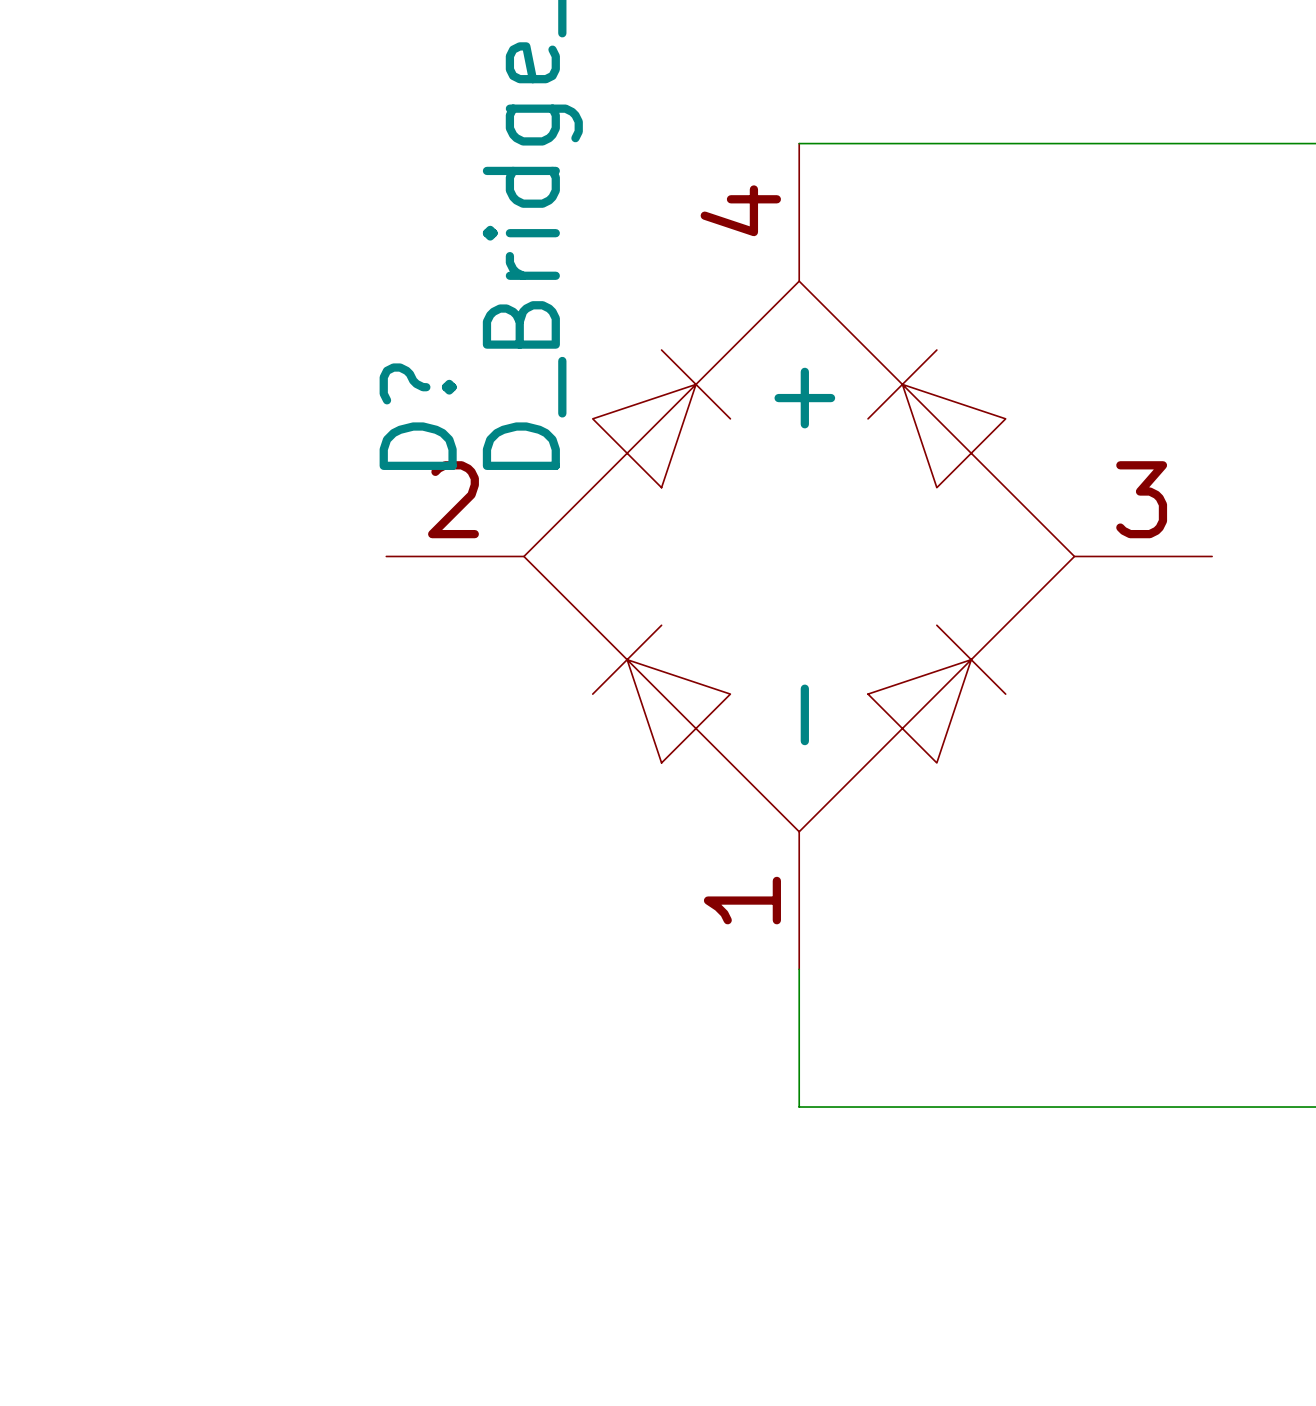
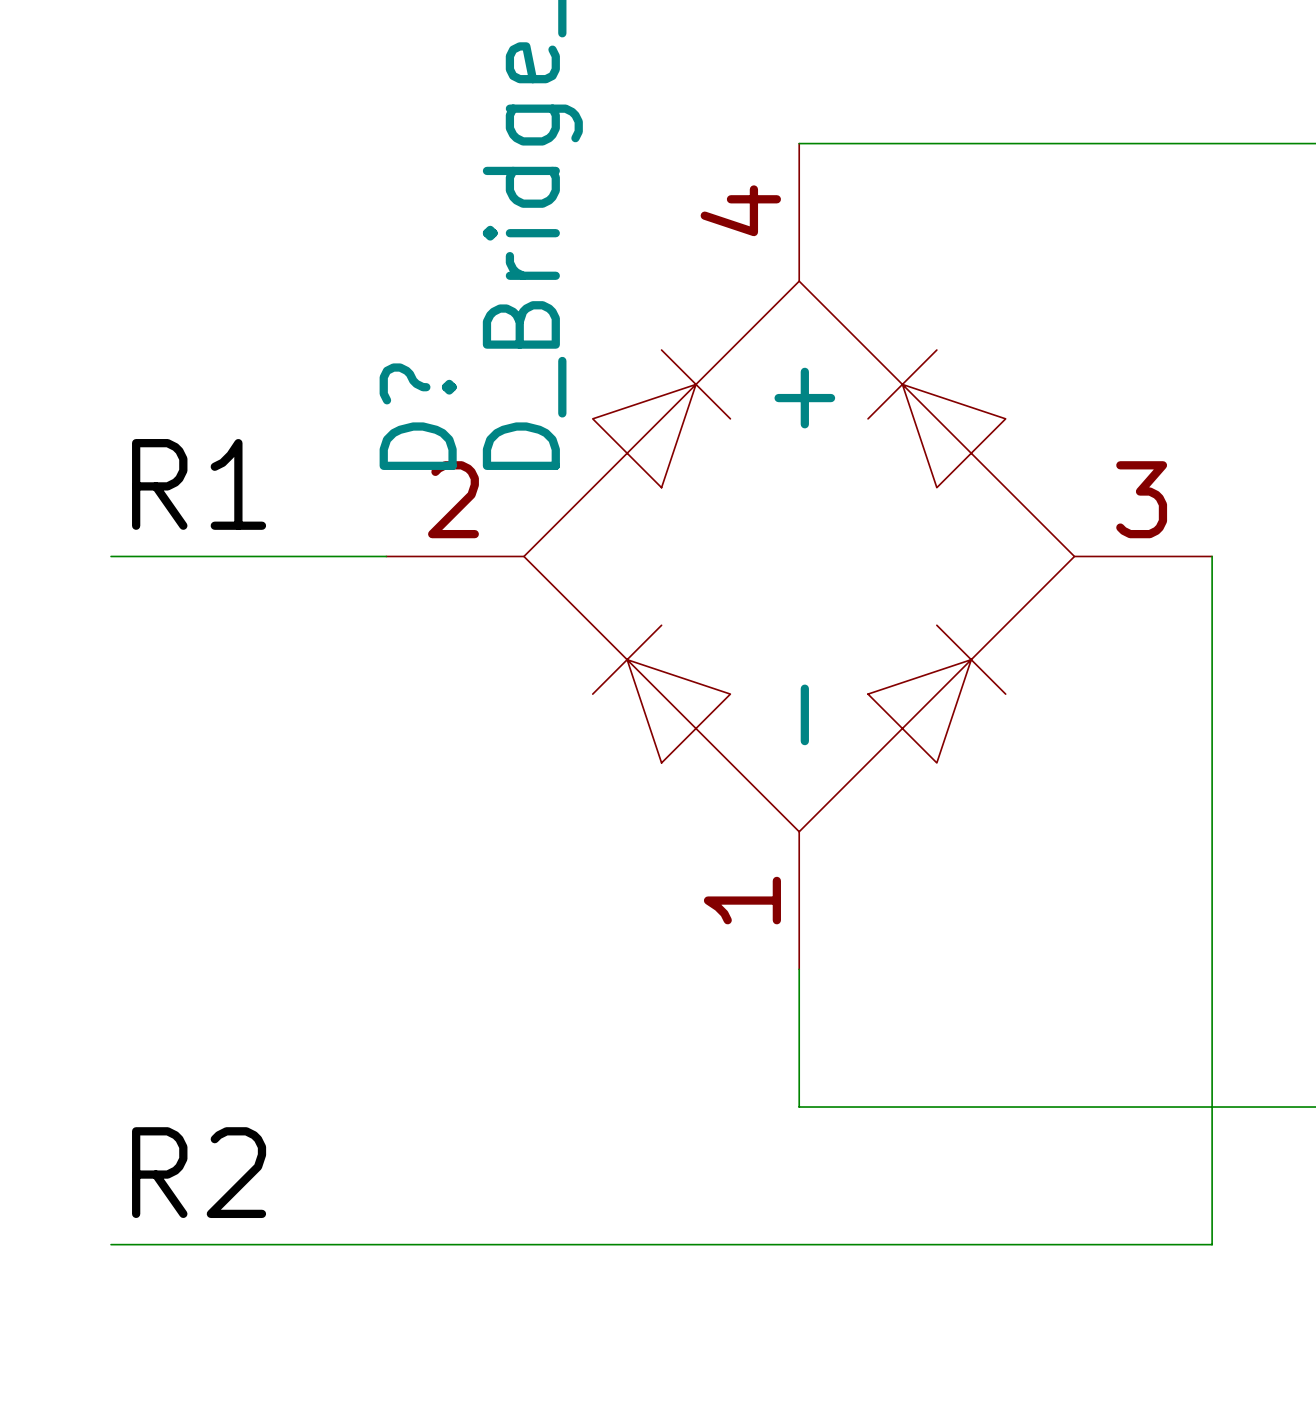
label: none -> R1 (199, 484)
wire: none -> (111, 556) (386, 556)
wire: none -> (1212, 556) (1212, 1244) (111, 1244)
label: none -> R2 (199, 1172)

